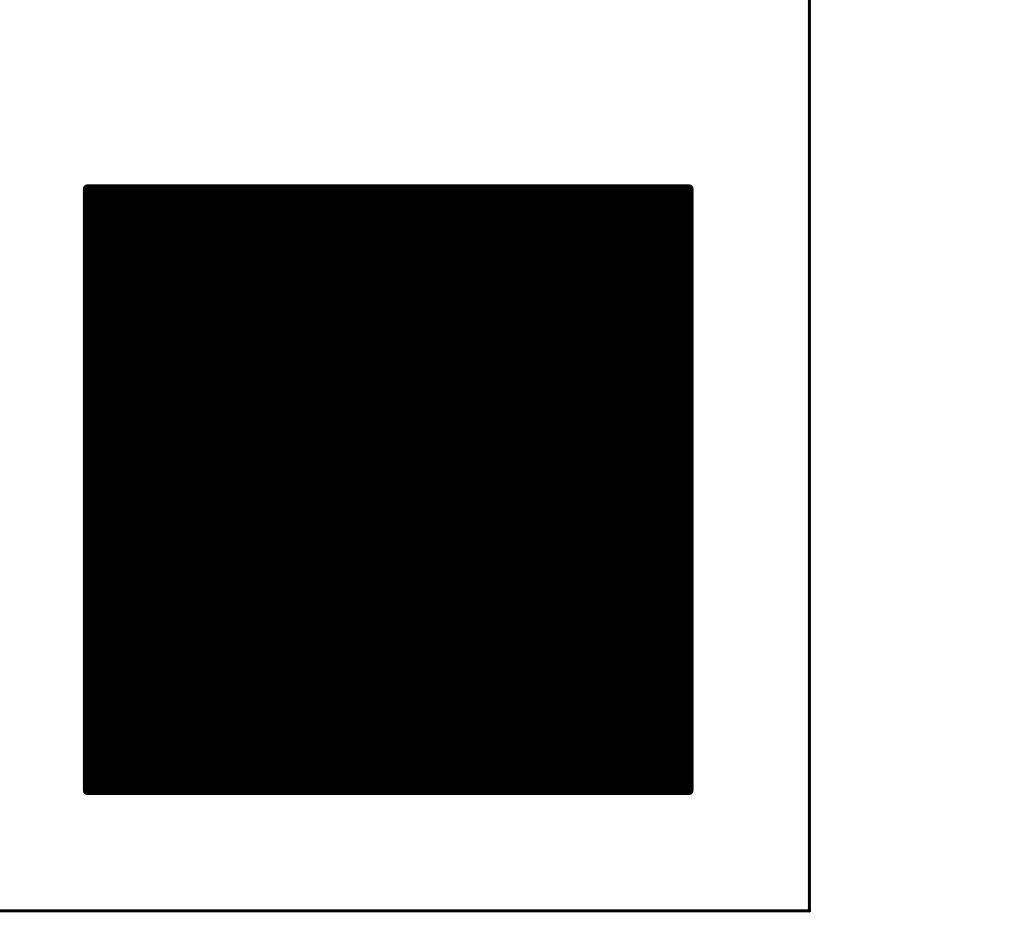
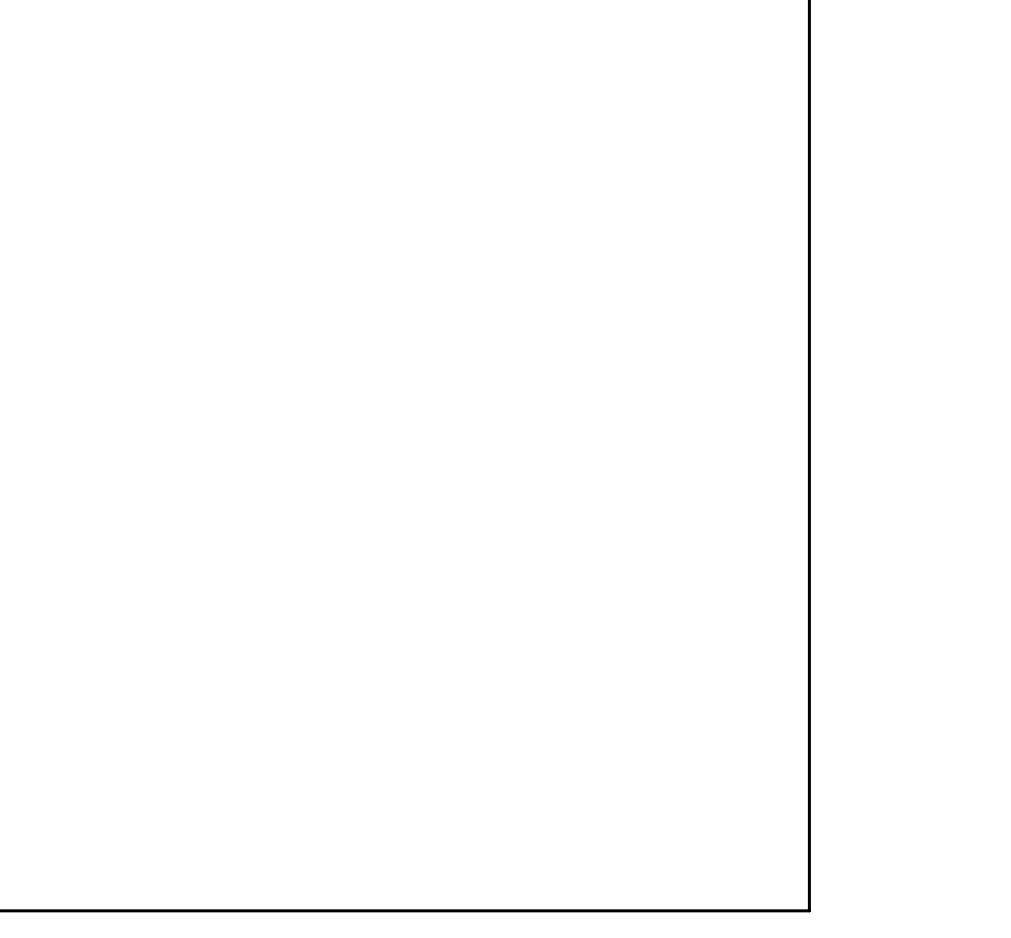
drawing: [82, 184, 694, 796] -> none

